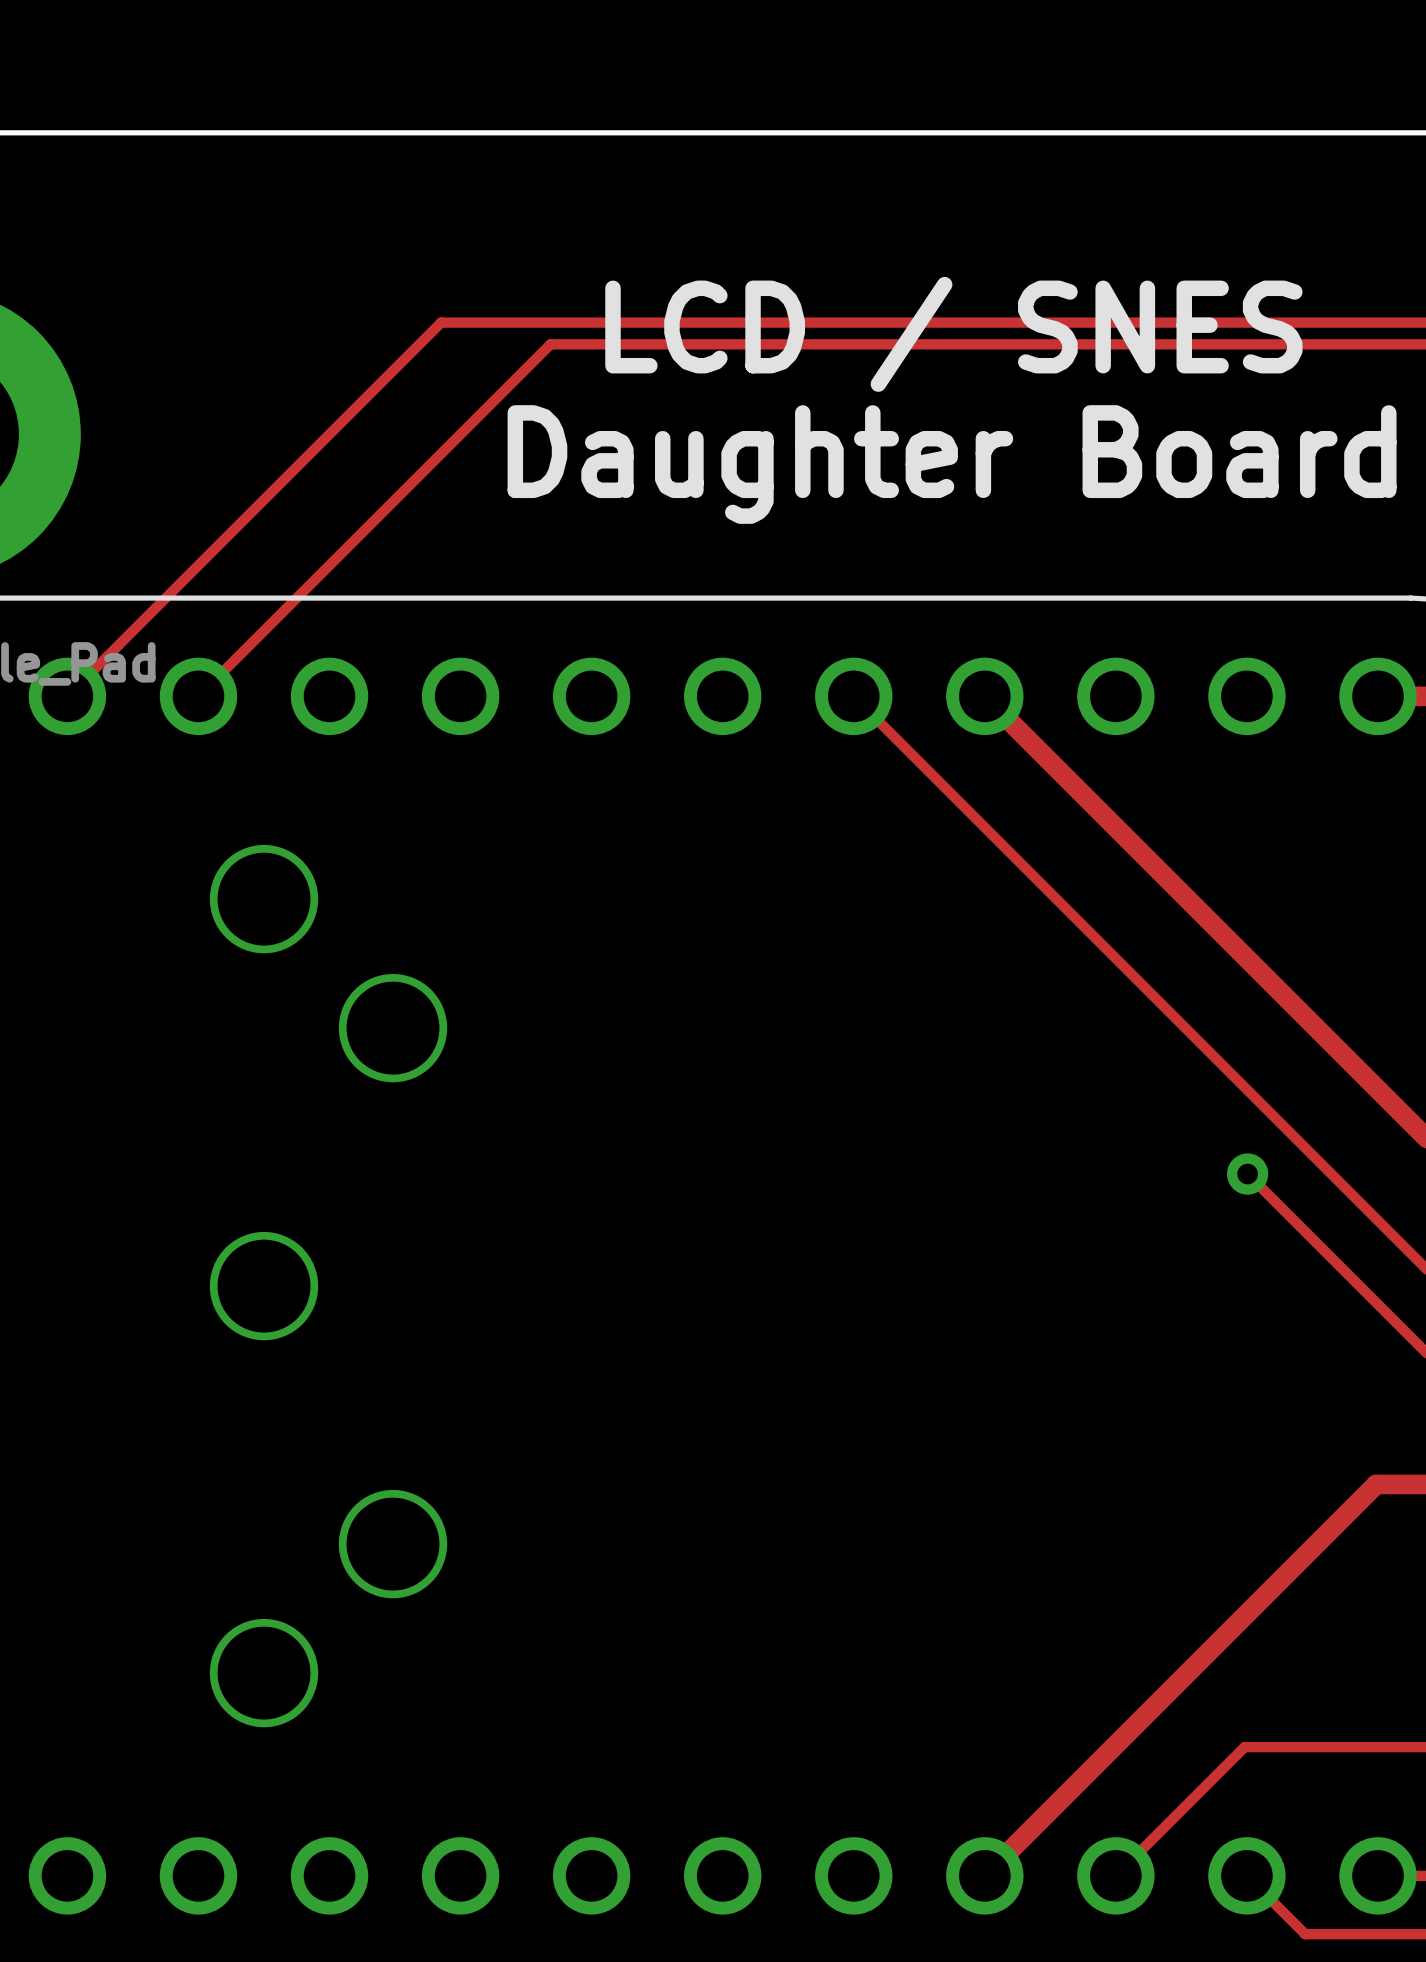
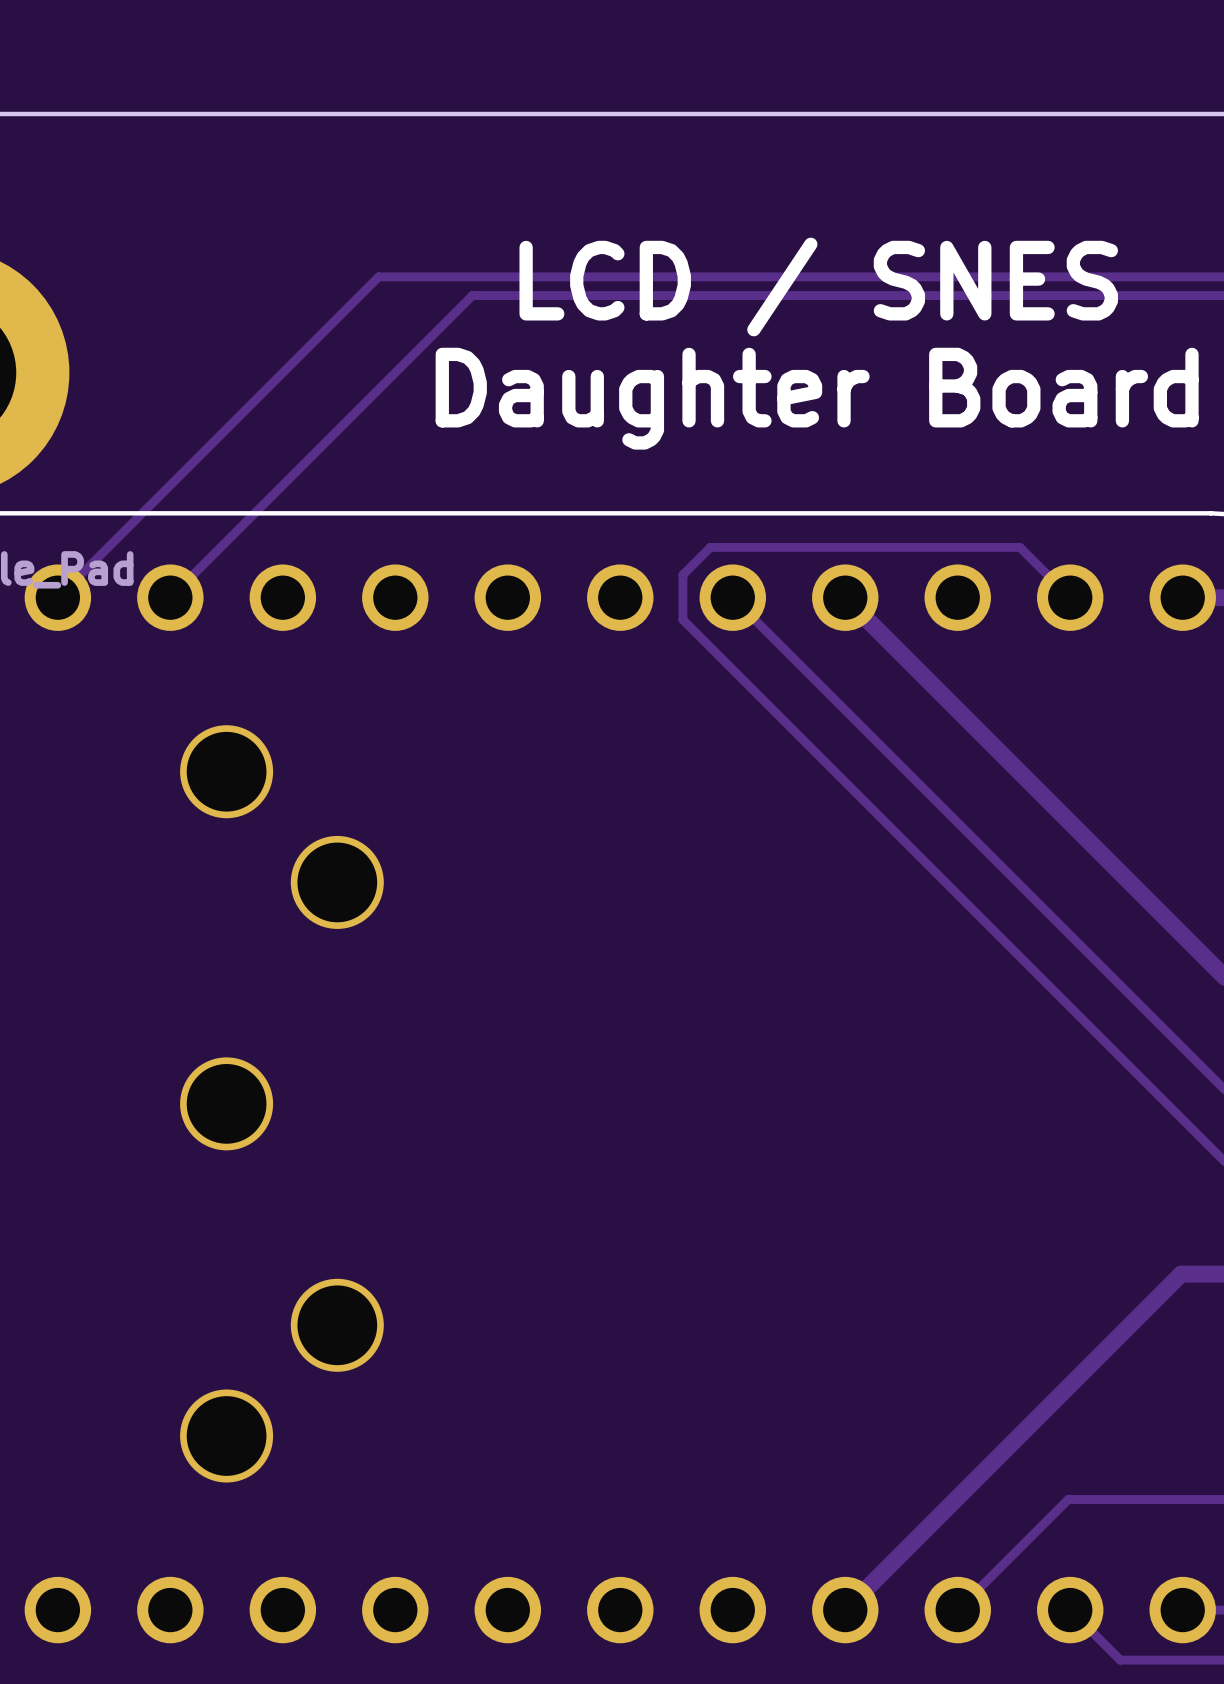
track: none -> (1070, 597) (1019, 547) (710, 547) (682, 574) (682, 619) (1070, 1007)
via: (1247, 1174) -> none

